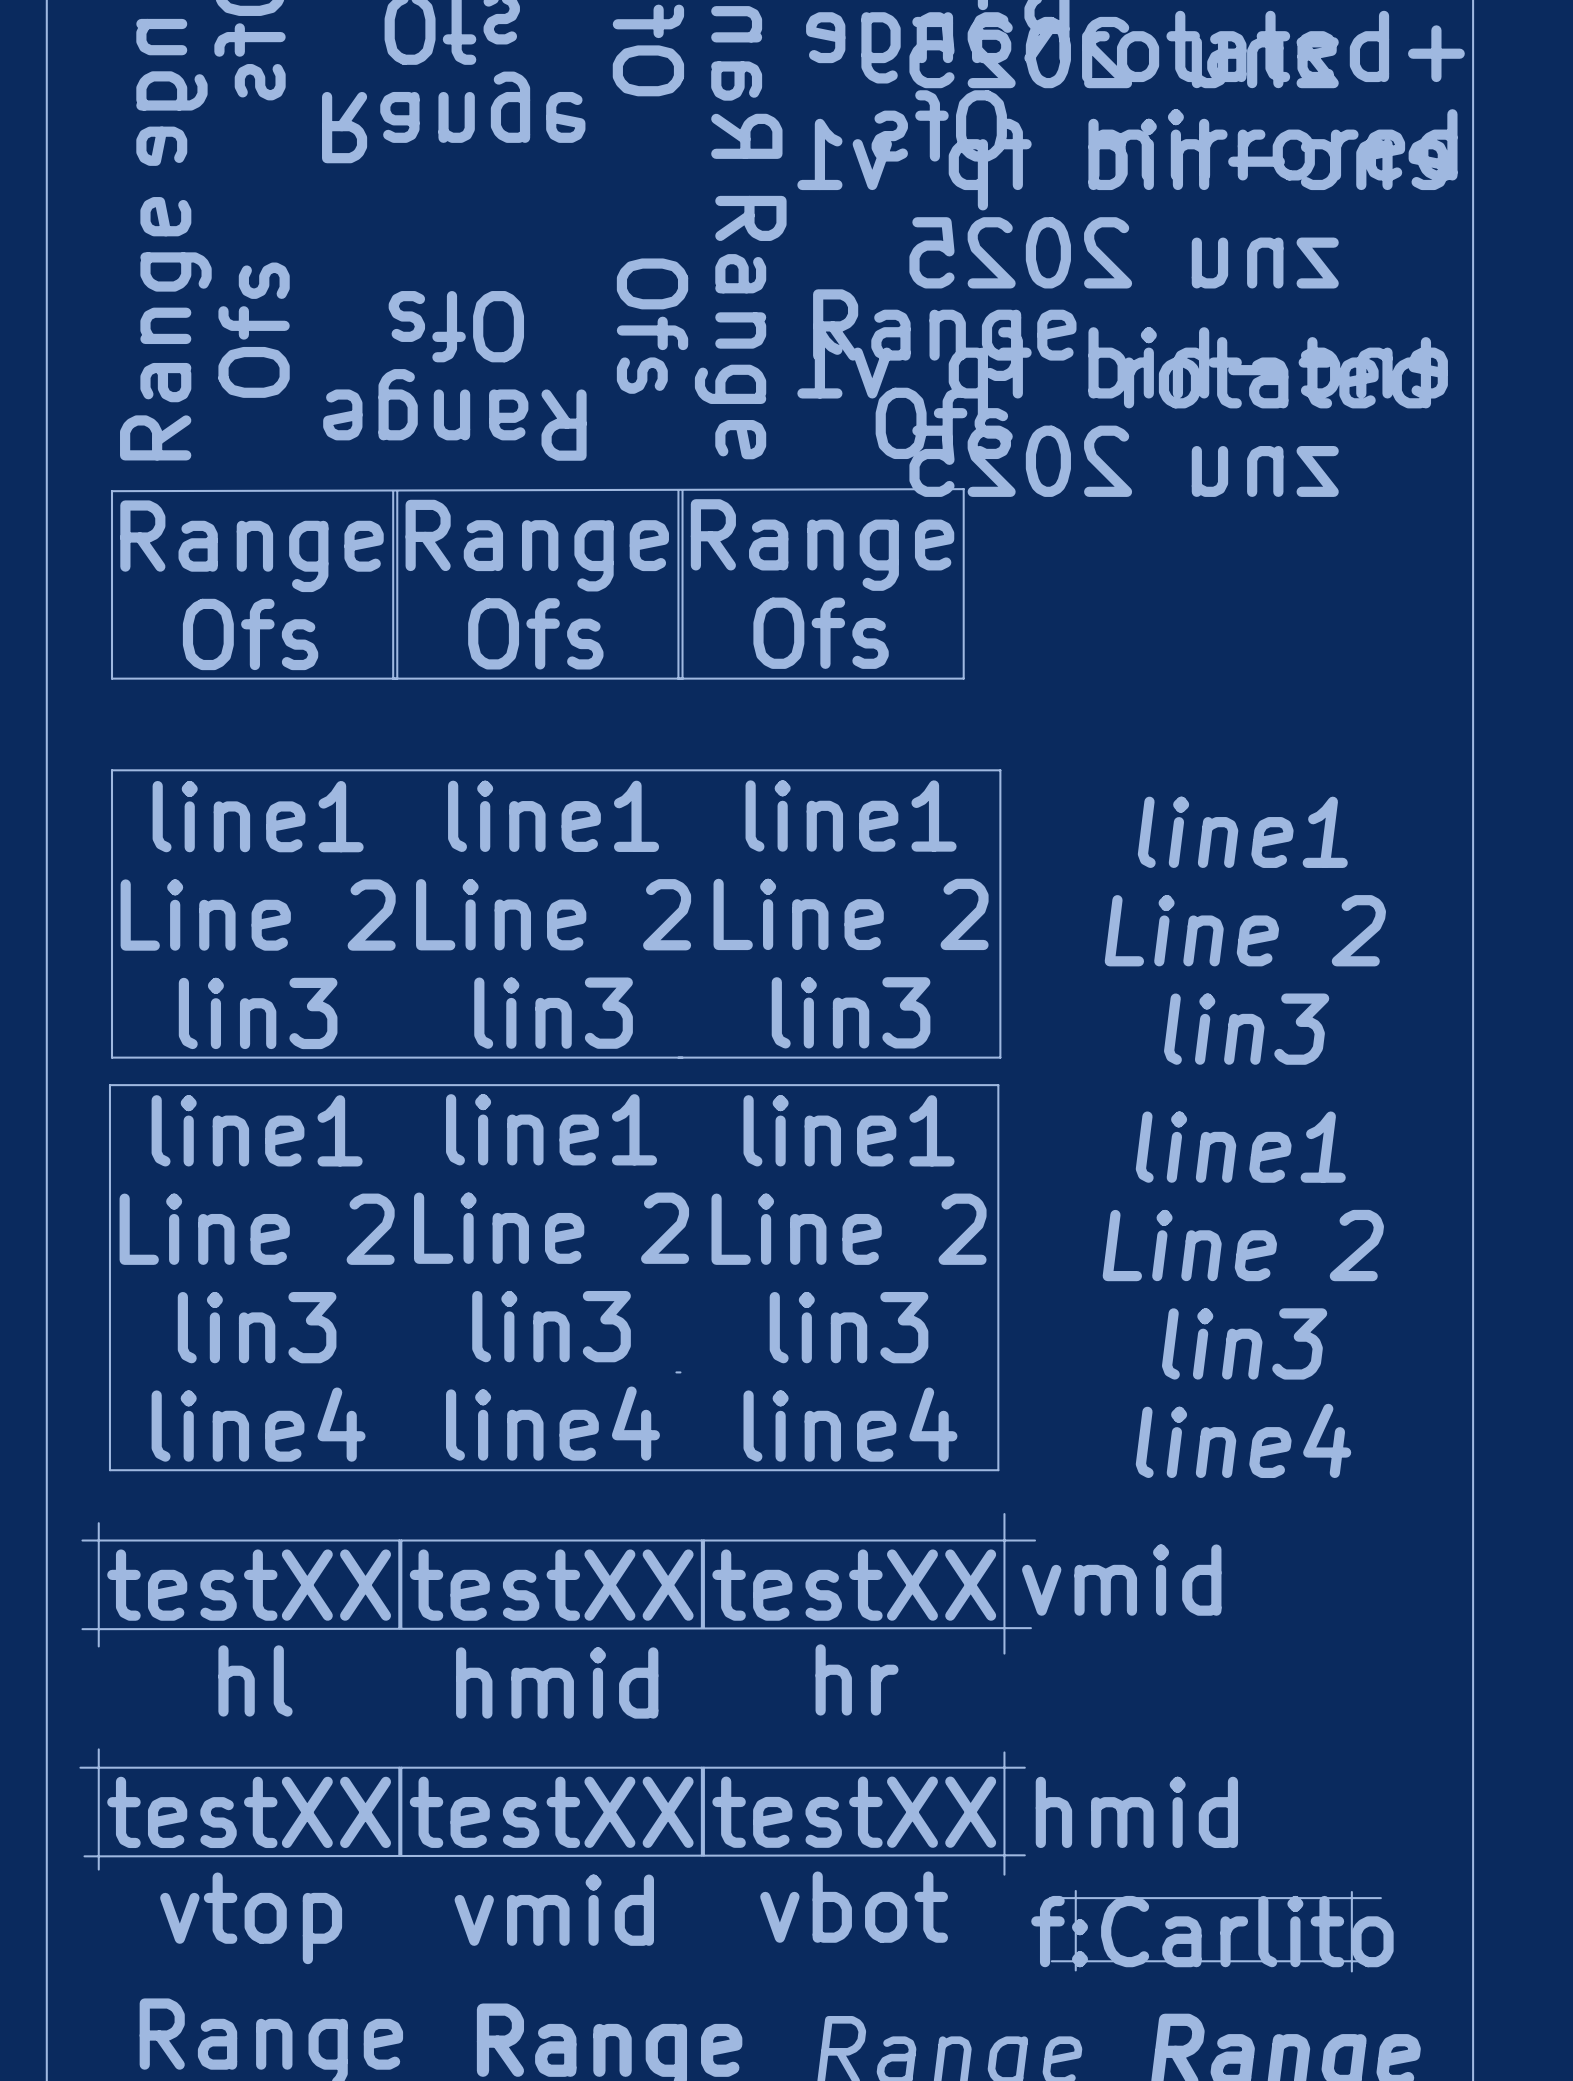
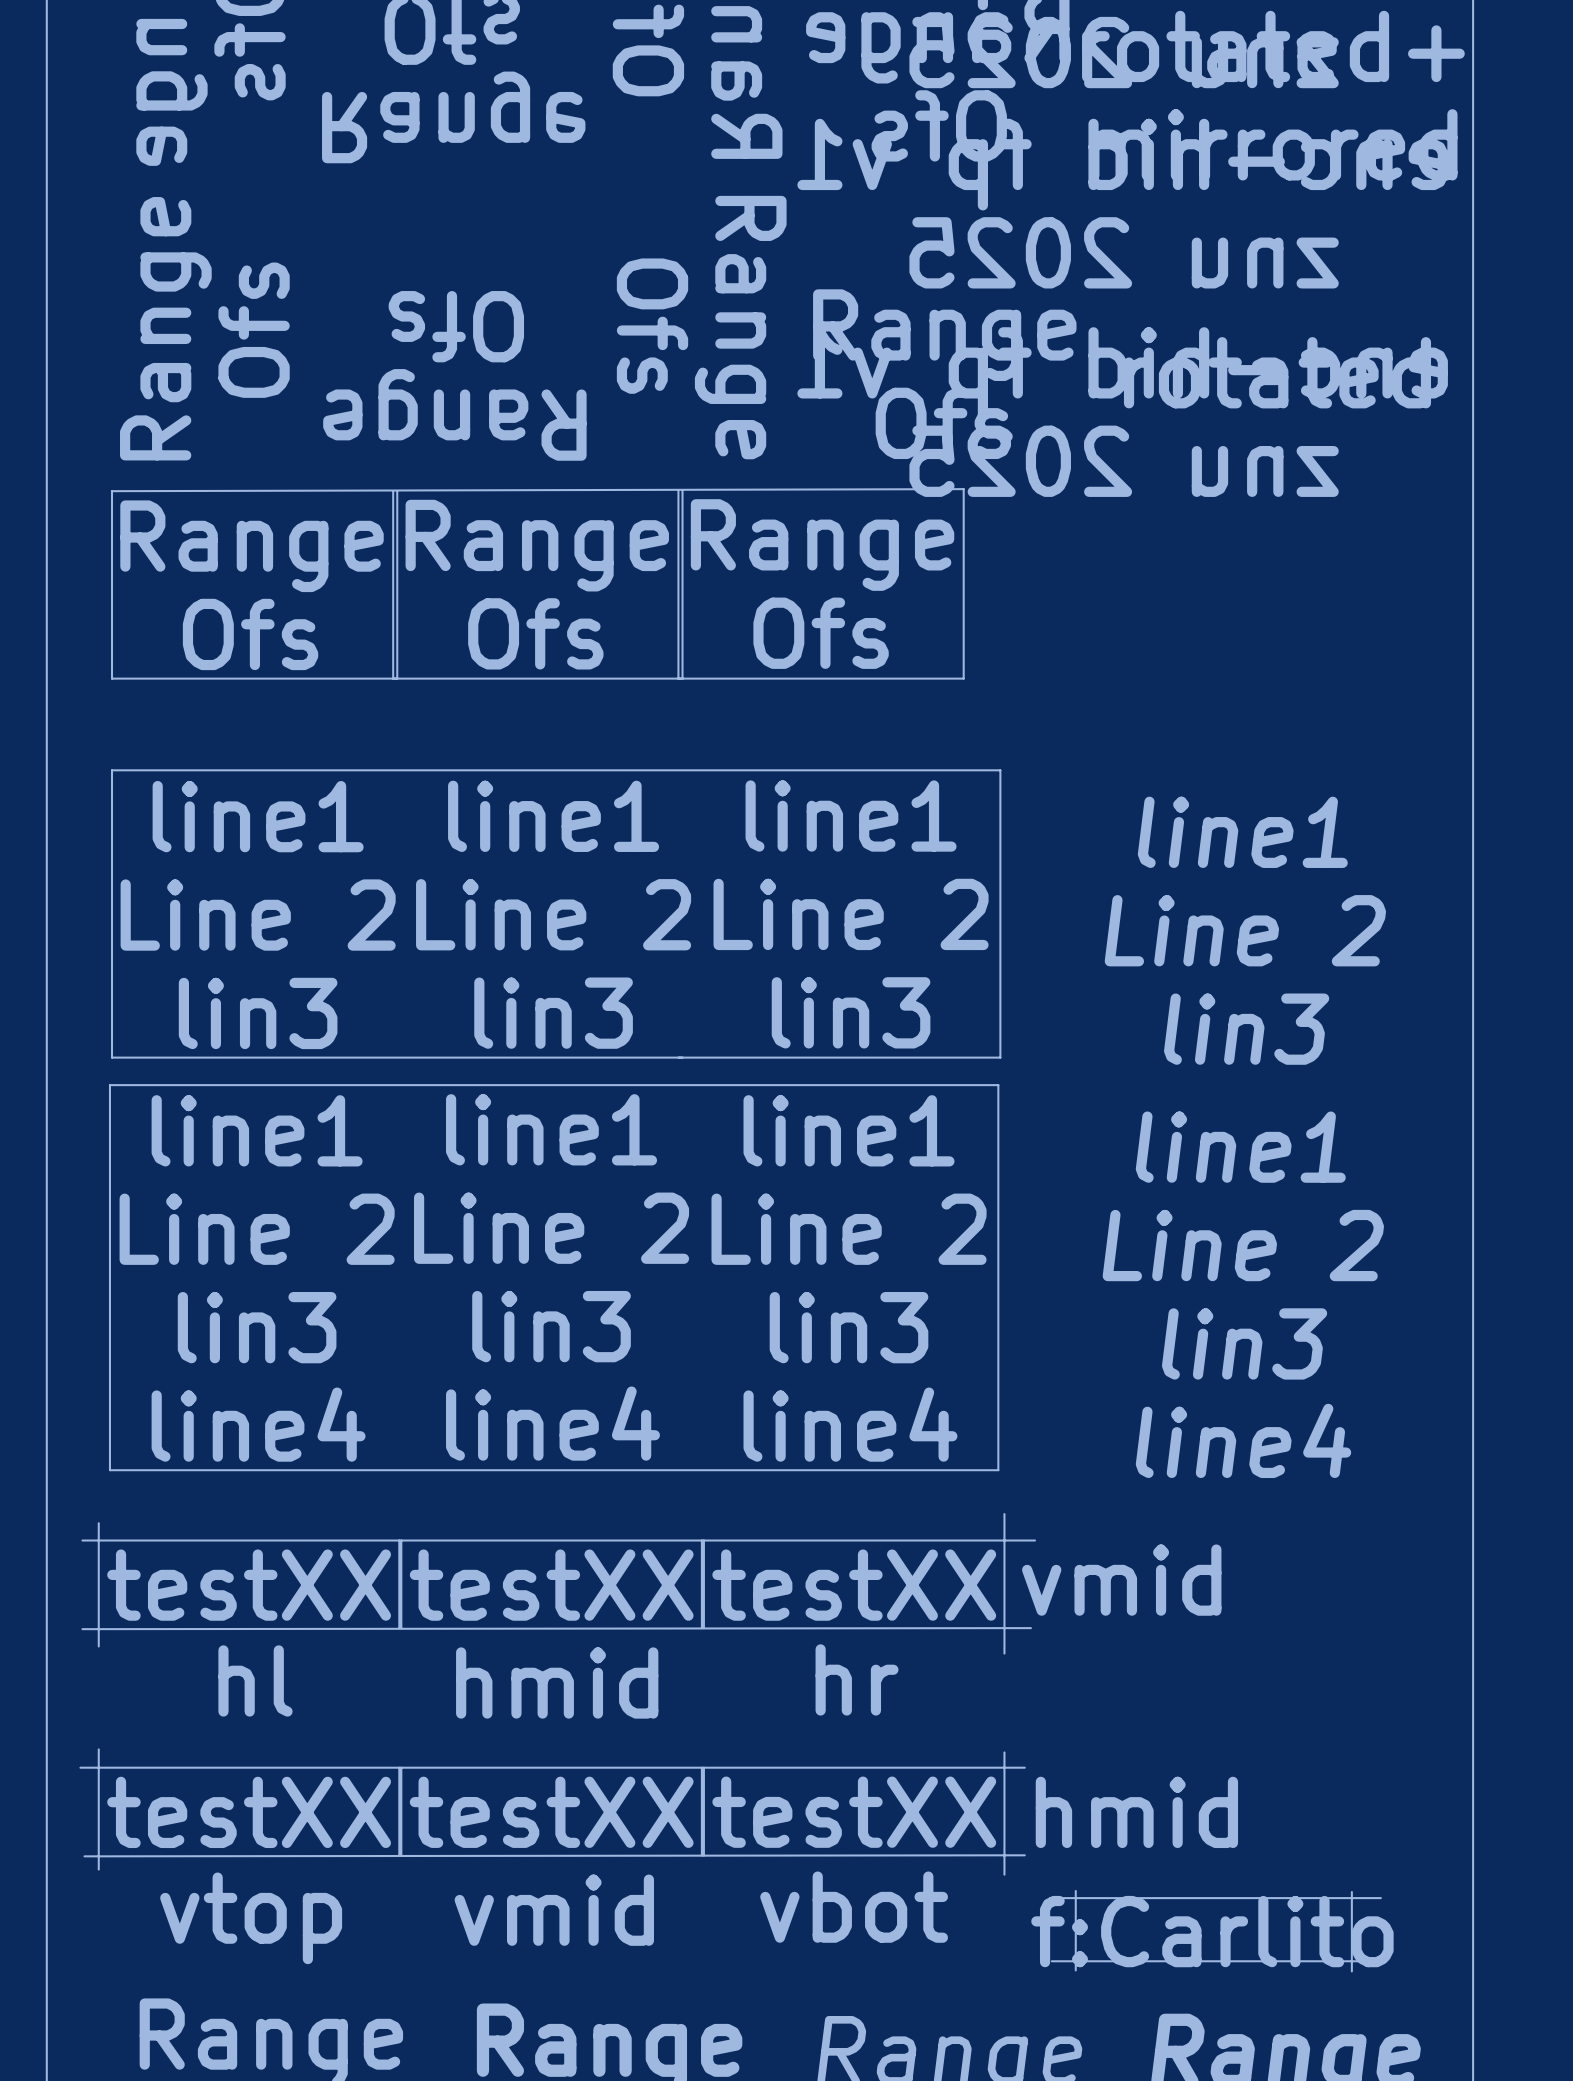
line: (676, 1372) (680, 1372) -> none

